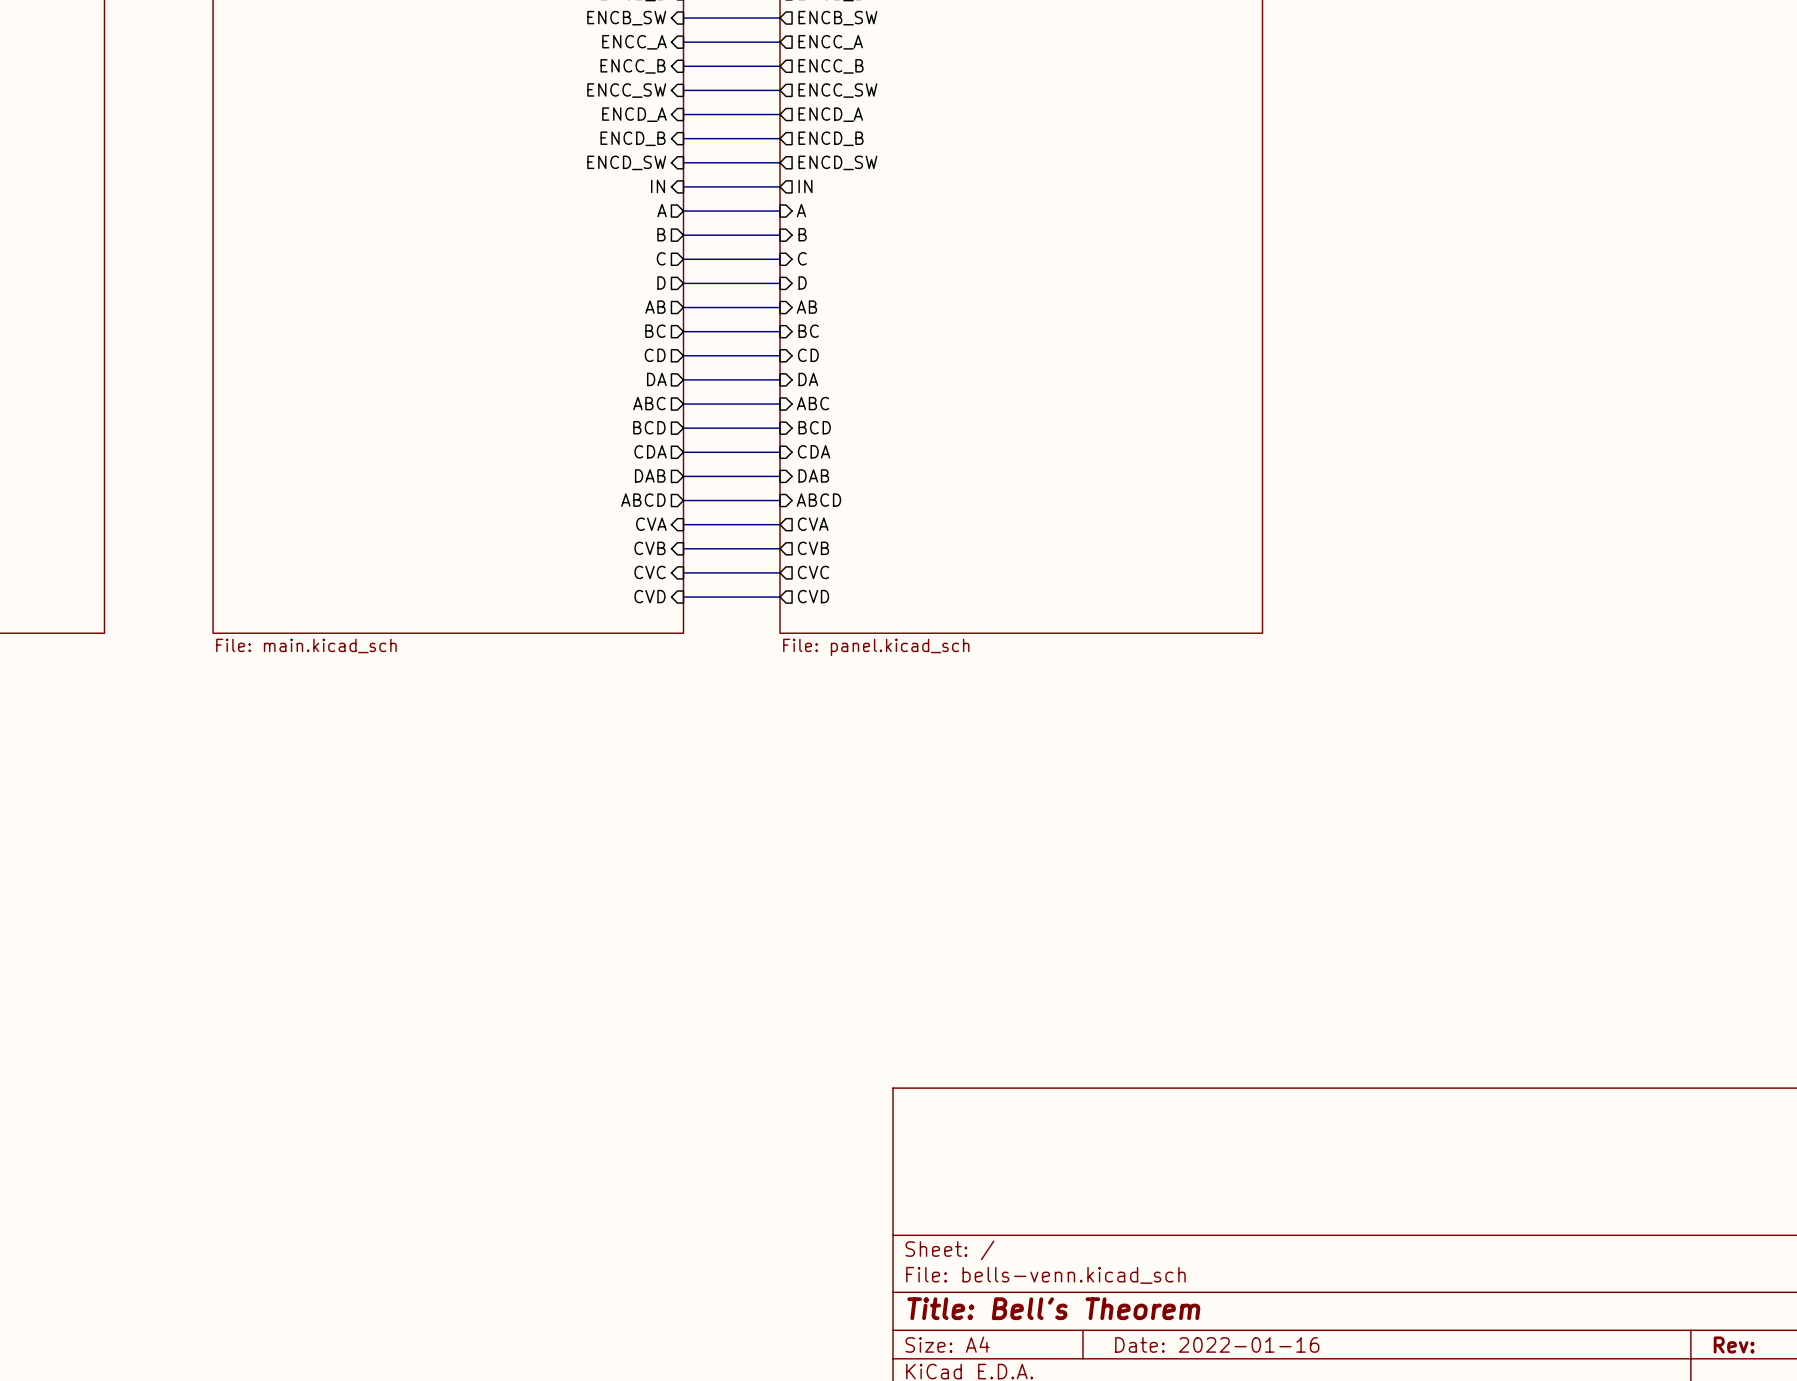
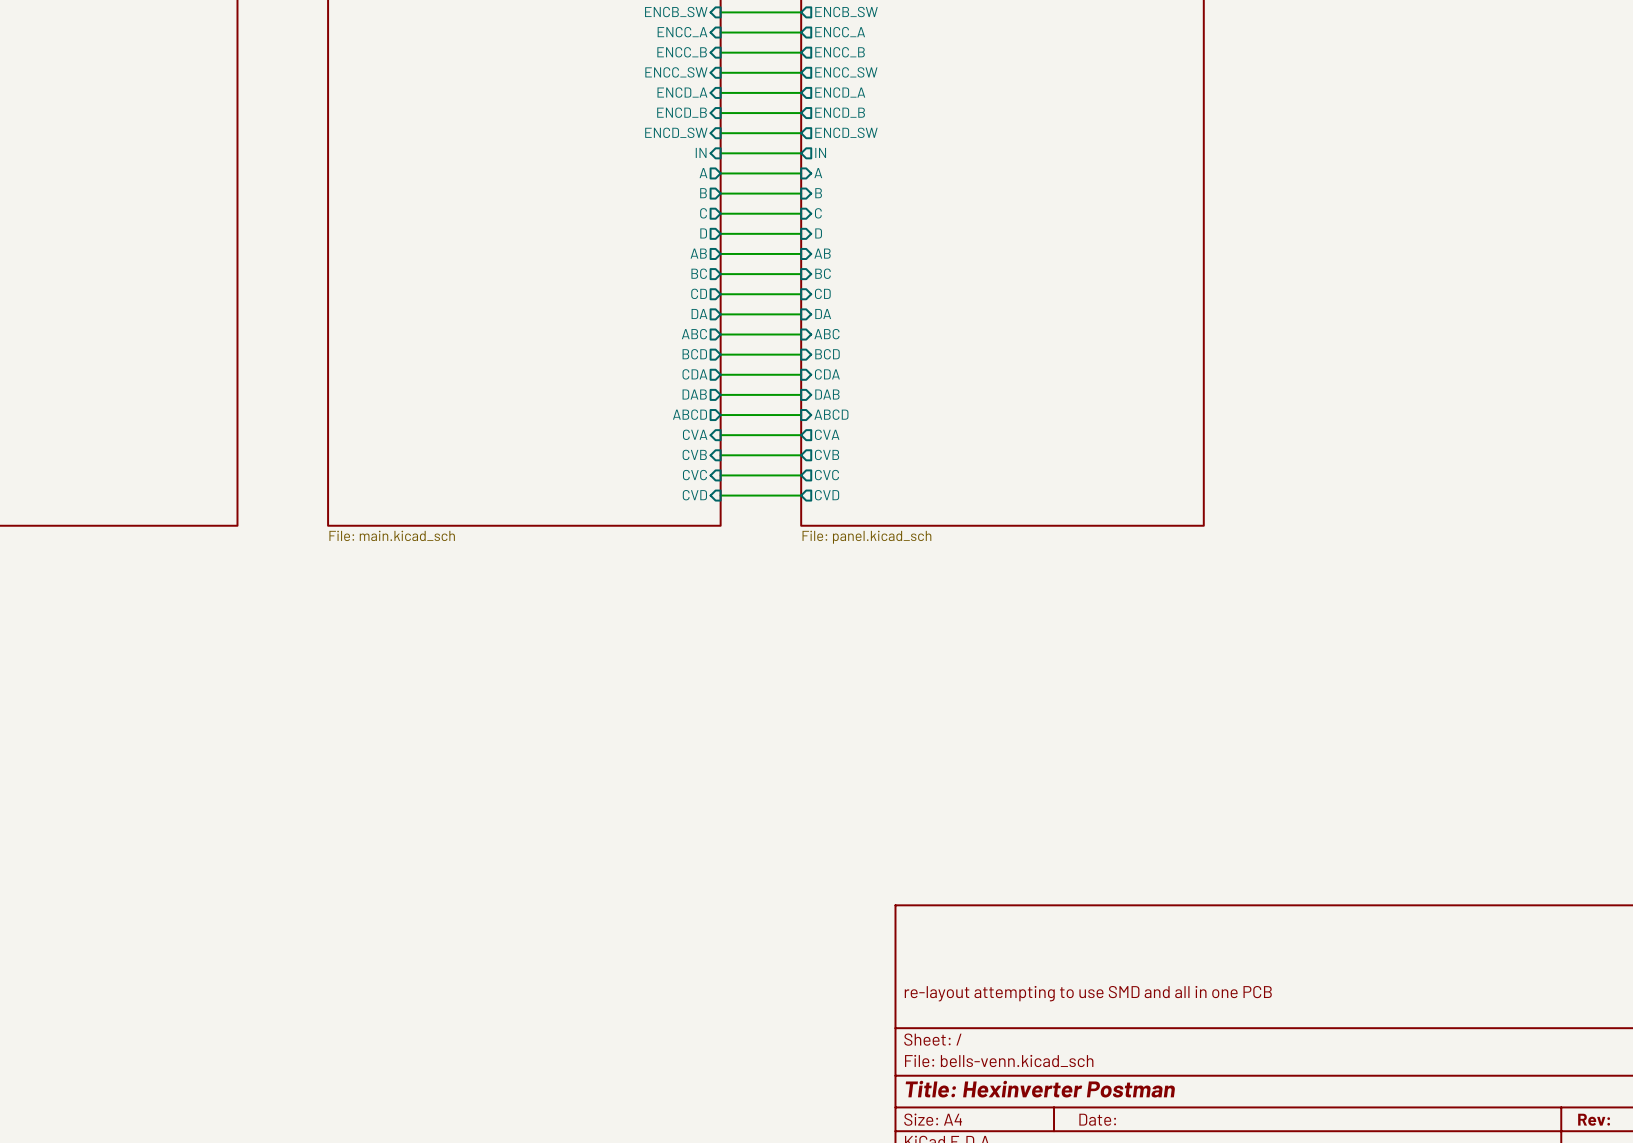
title block: none -> re-layout attempting to use SMD and all in one PCB (1088, 993)
title block: Title: Bell's Theorem (1053, 1308) -> Title: Hexinverter Postman (1040, 1089)
title block: Date: 2022-01-16 (1217, 1344) -> Date: (1097, 1119)

